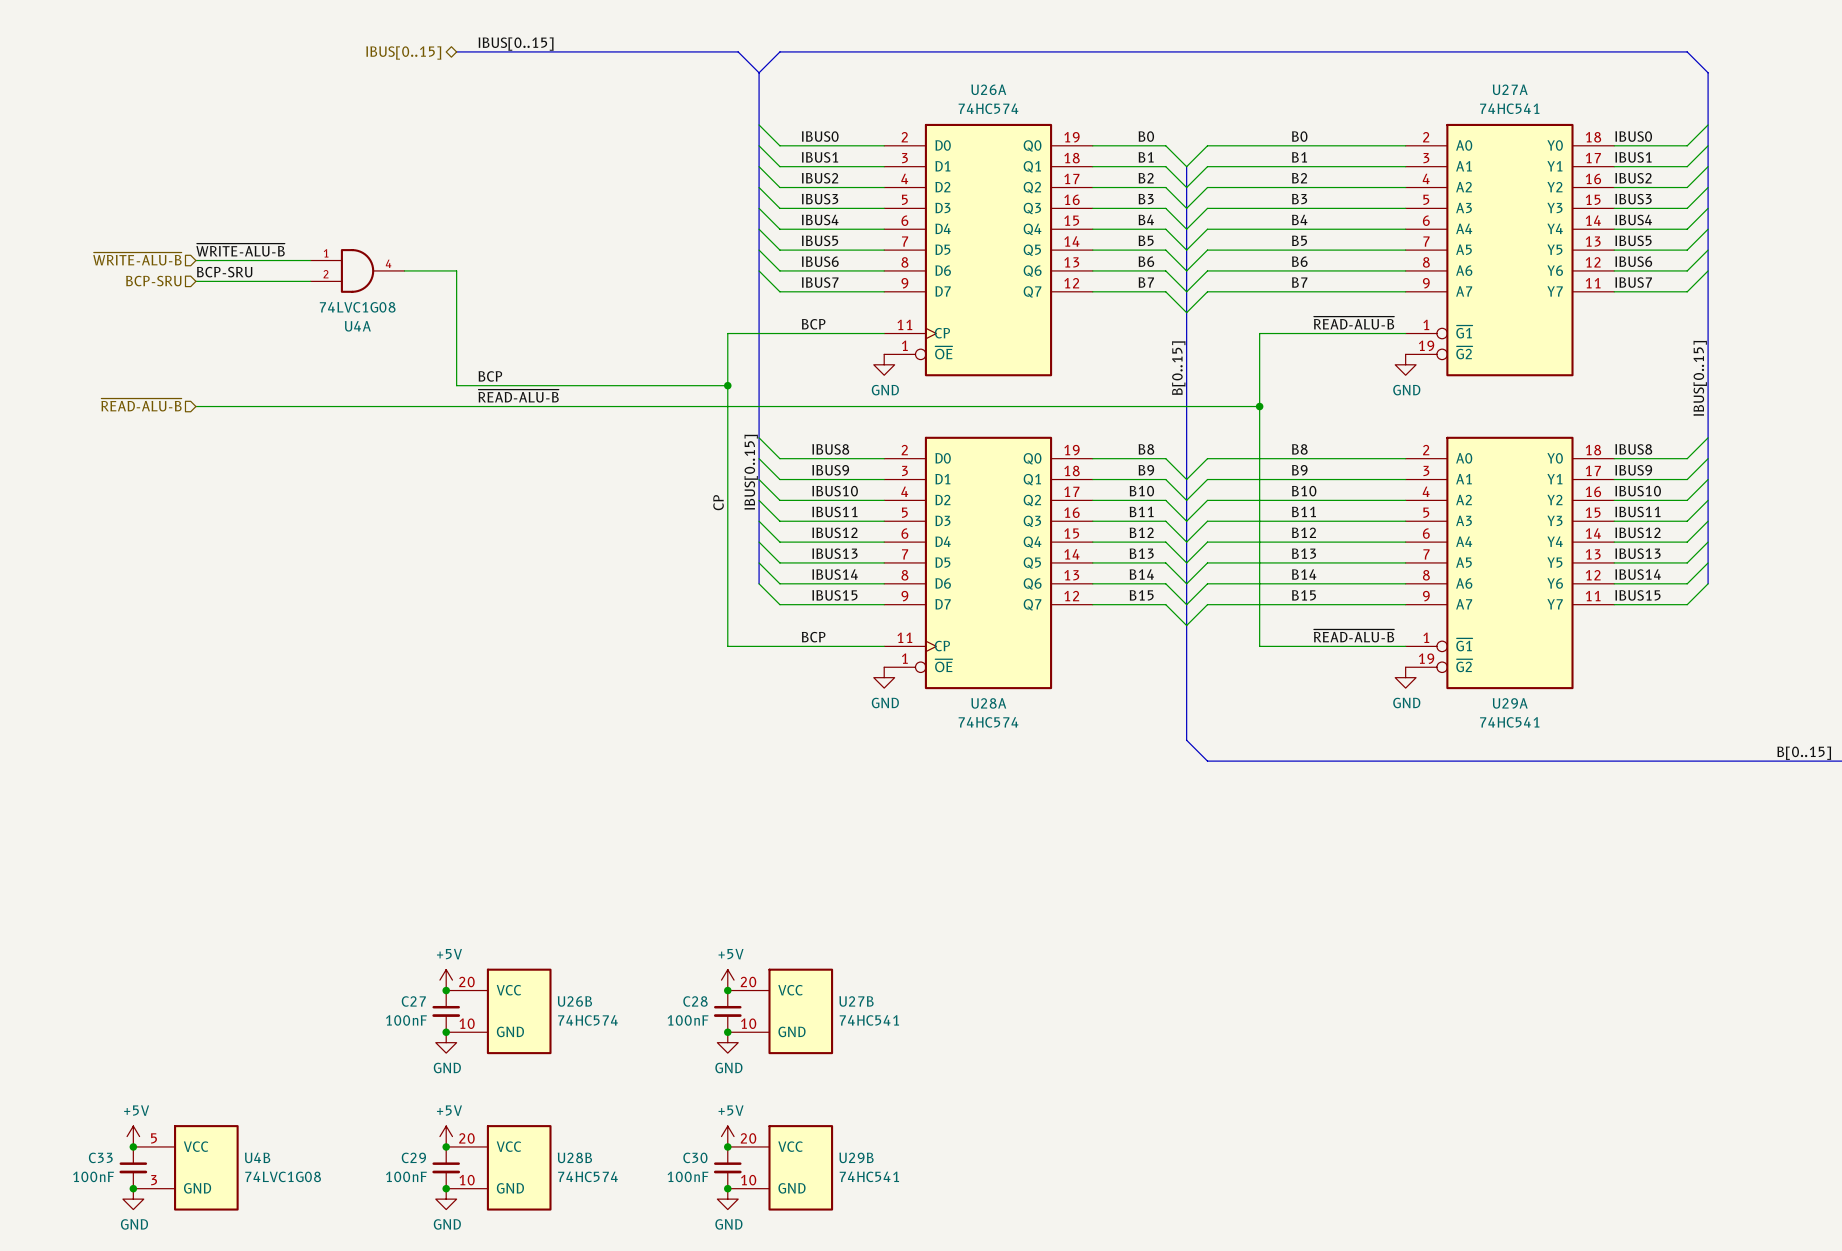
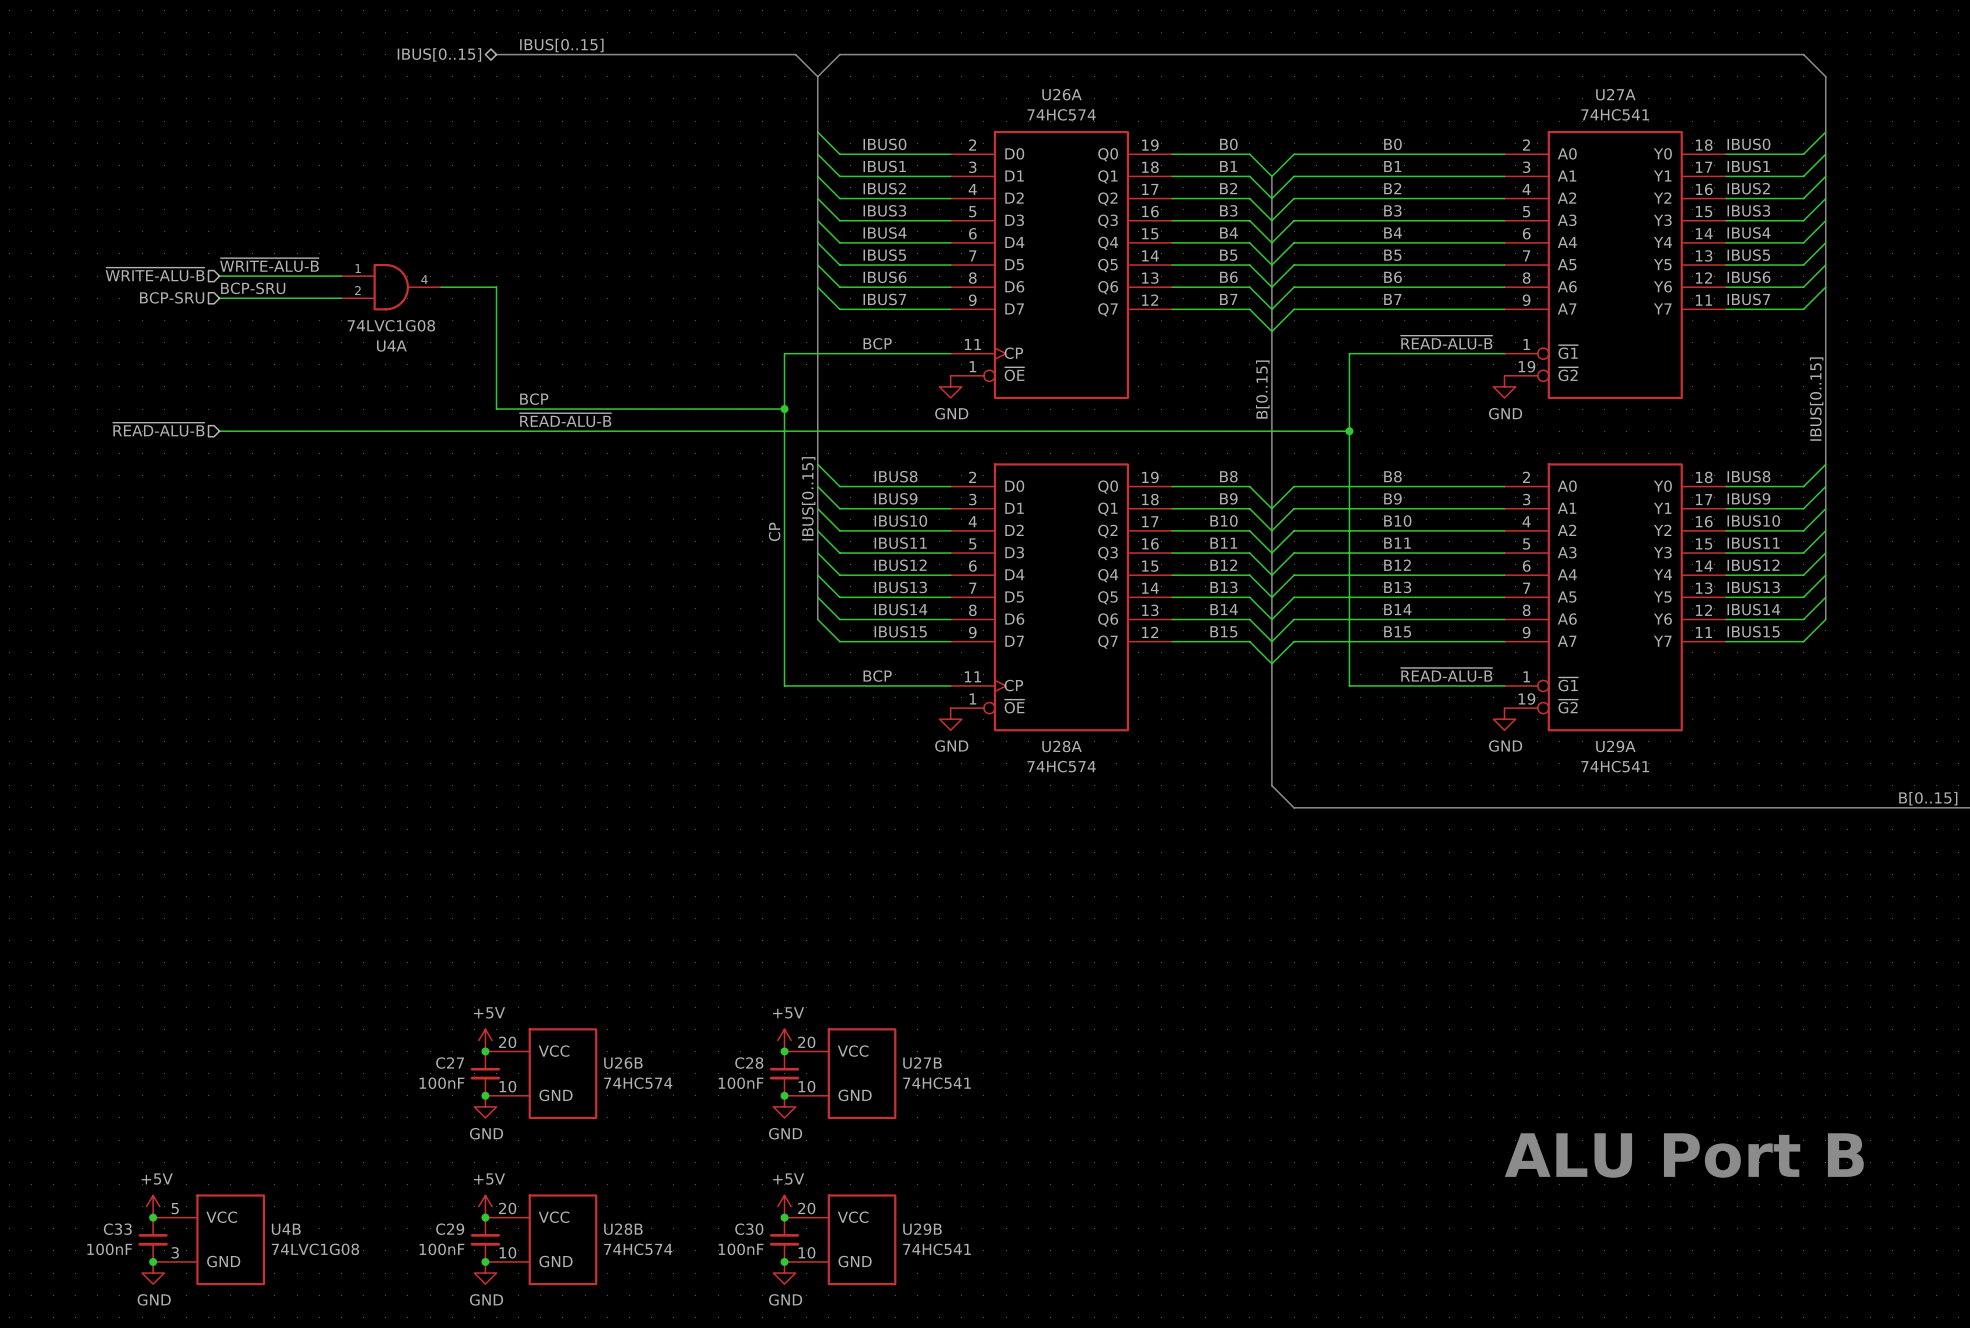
text: none -> ALU Port B (1684, 1155)

